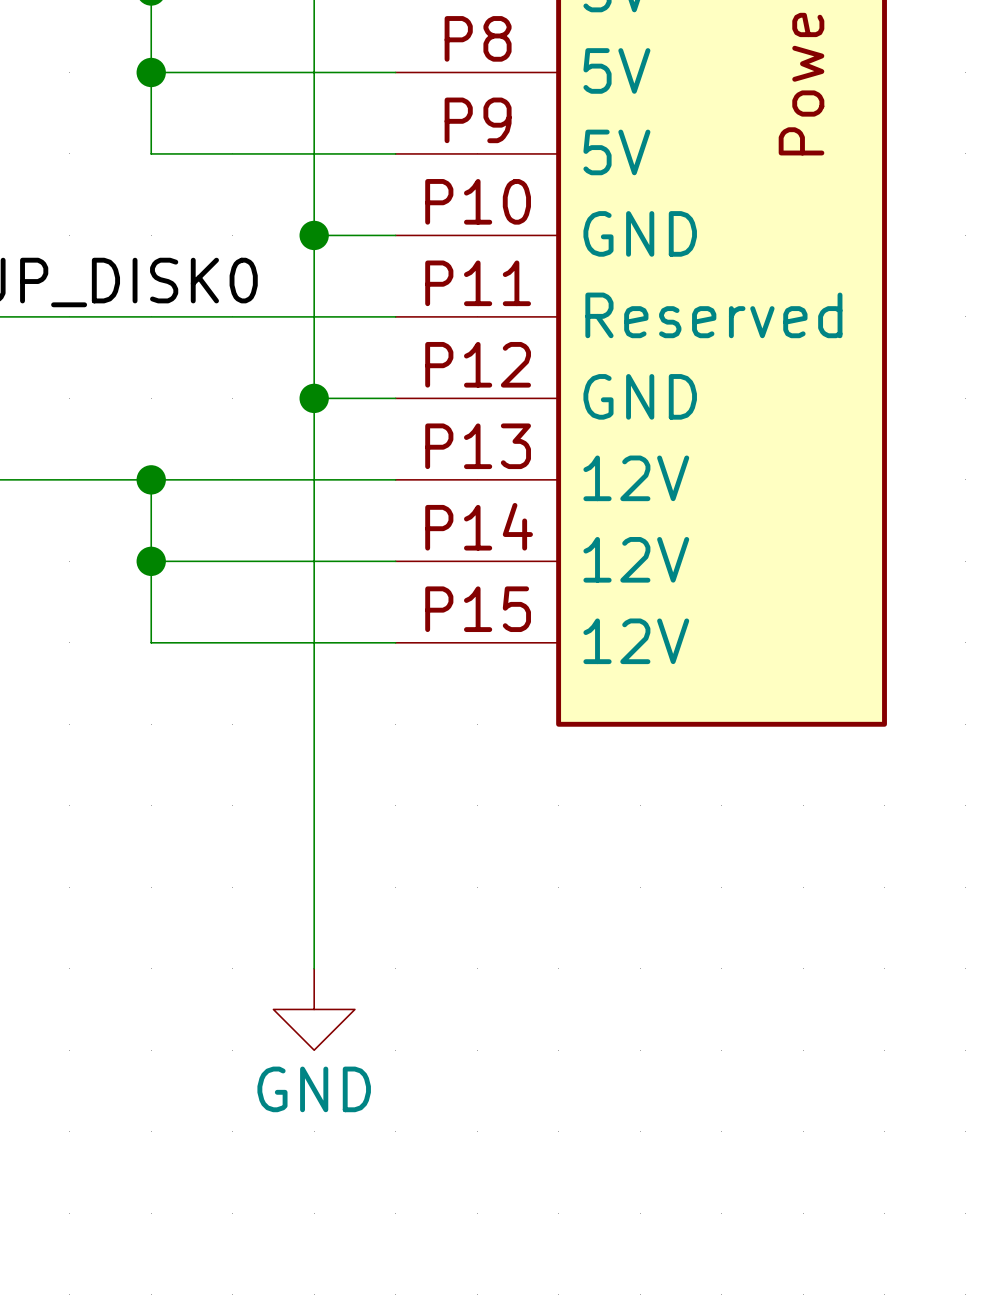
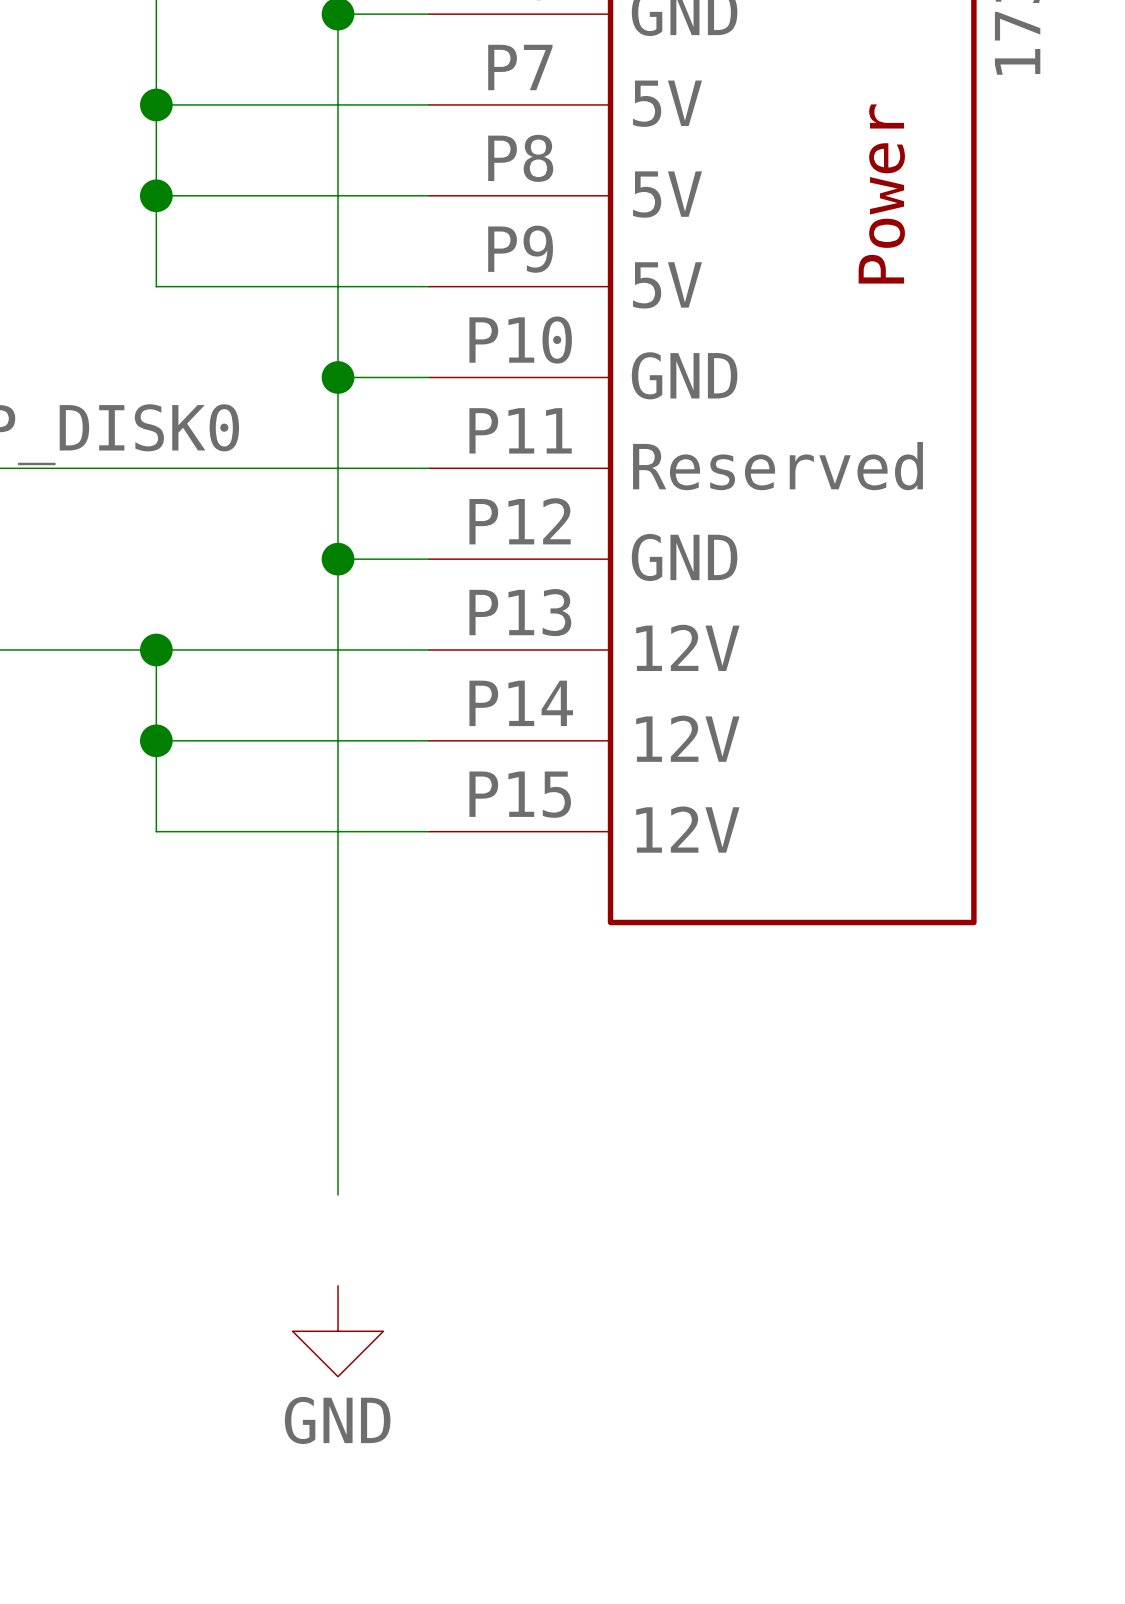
power symbol position: GND (314, 1009) -> GND (338, 1331)

